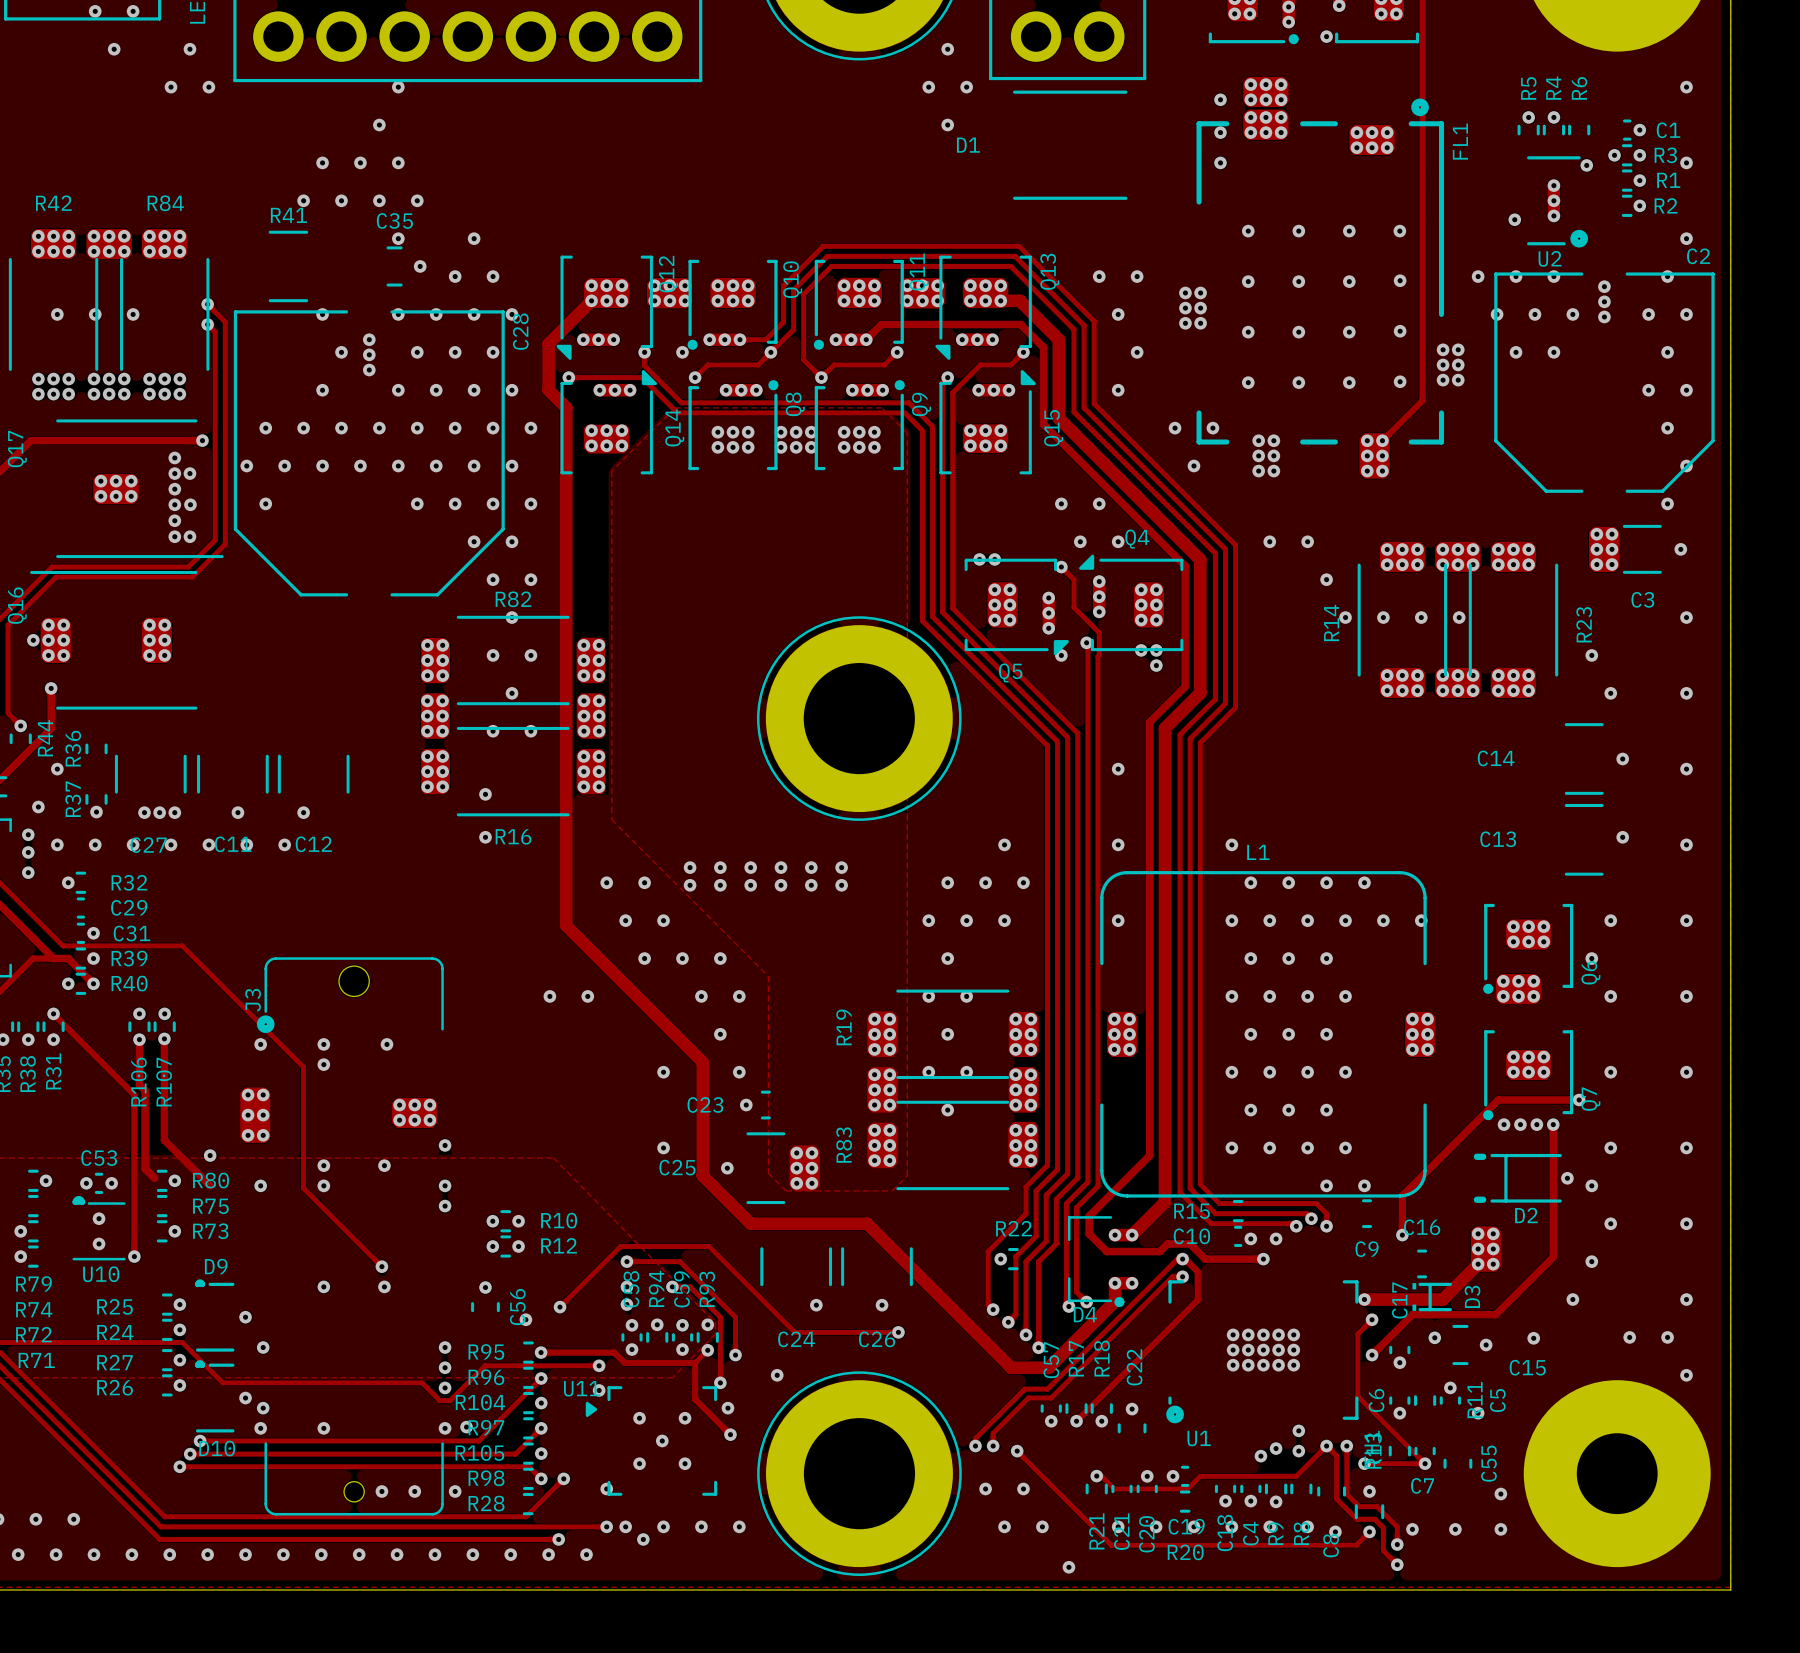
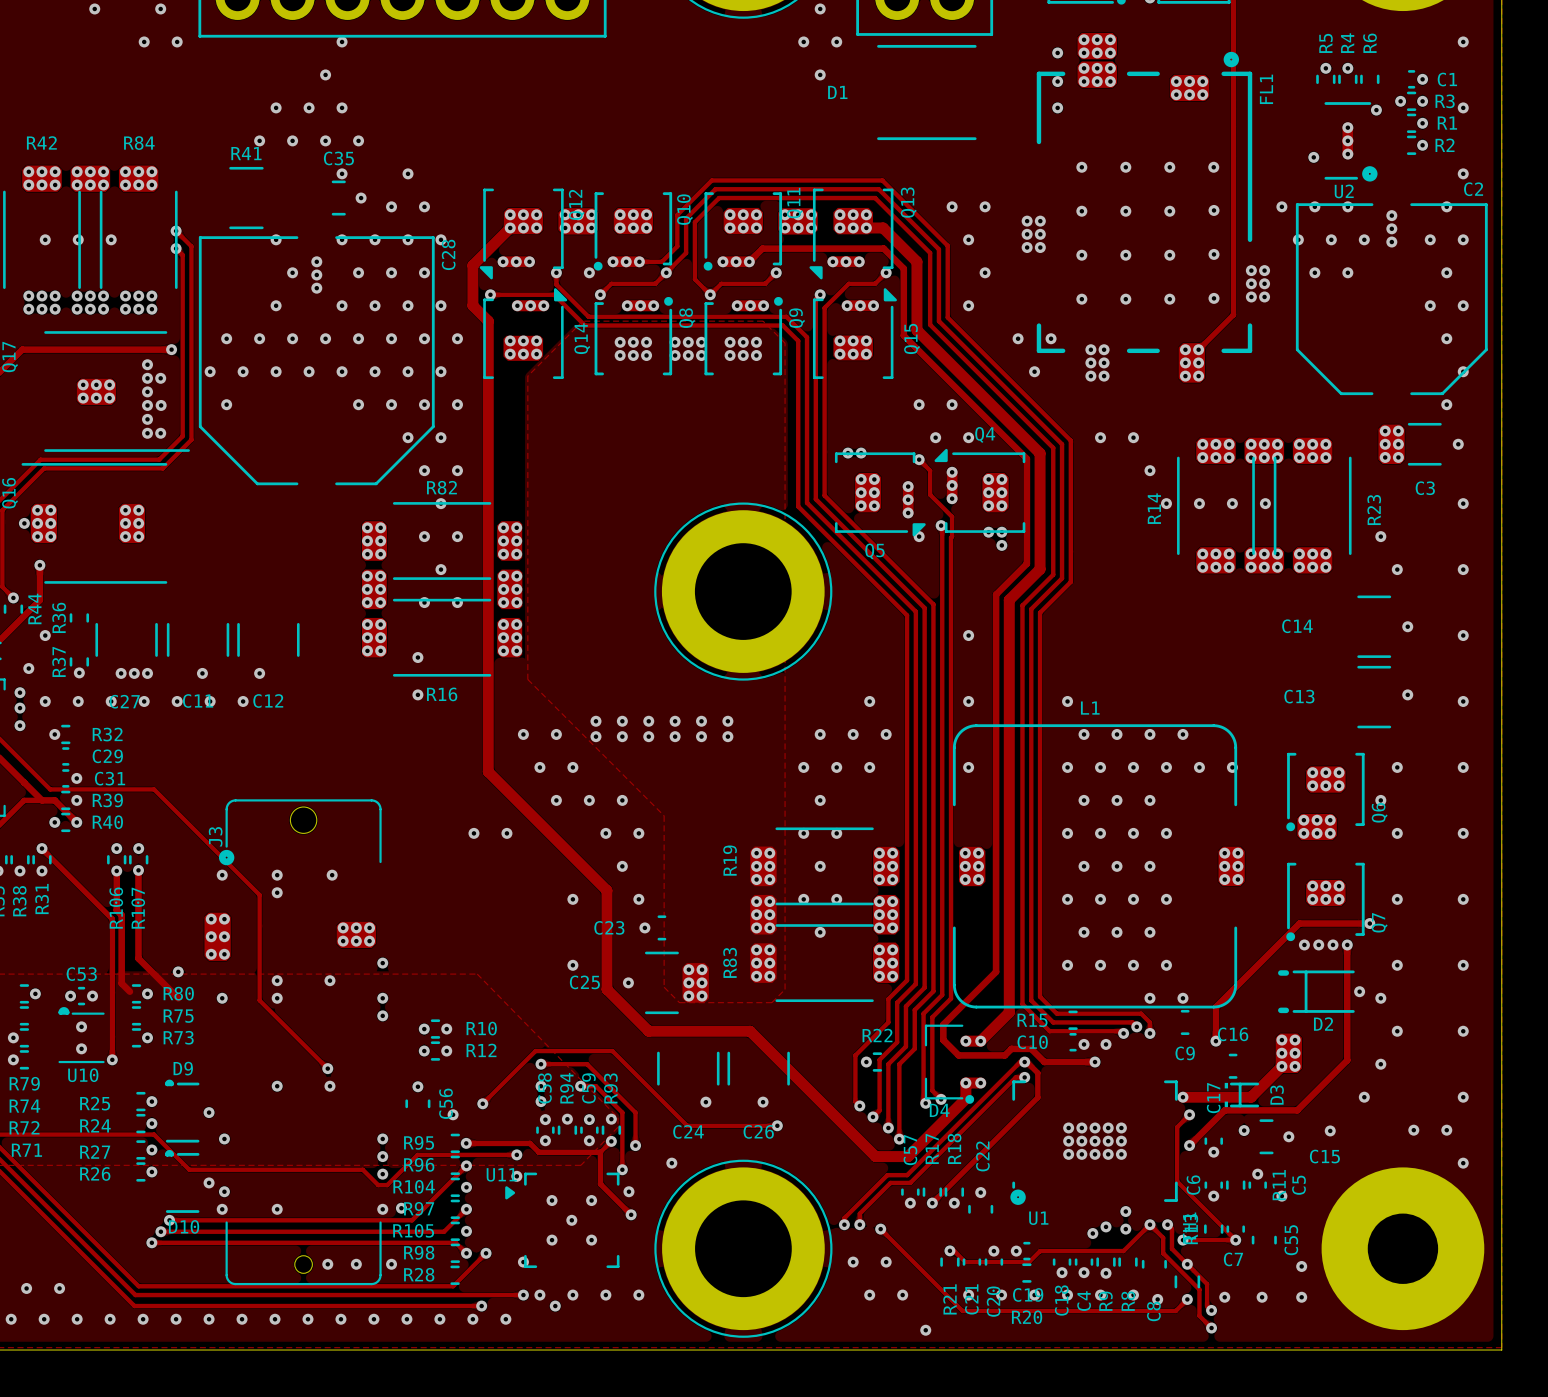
track: (1346, 1446) (1346, 1494) (1359, 1506) (1377, 1506) (1397, 1526) (1397, 1544) -> (1167, 1224) (1171, 1229) (1171, 1248) (1207, 1284) (1207, 1306) (1211, 1310)
track: (1336, 1456) (1336, 1499) (1356, 1519) (1374, 1519) (1383, 1527) -> (1158, 1233) (1163, 1237) (1163, 1253) (1199, 1289) (1199, 1296)

